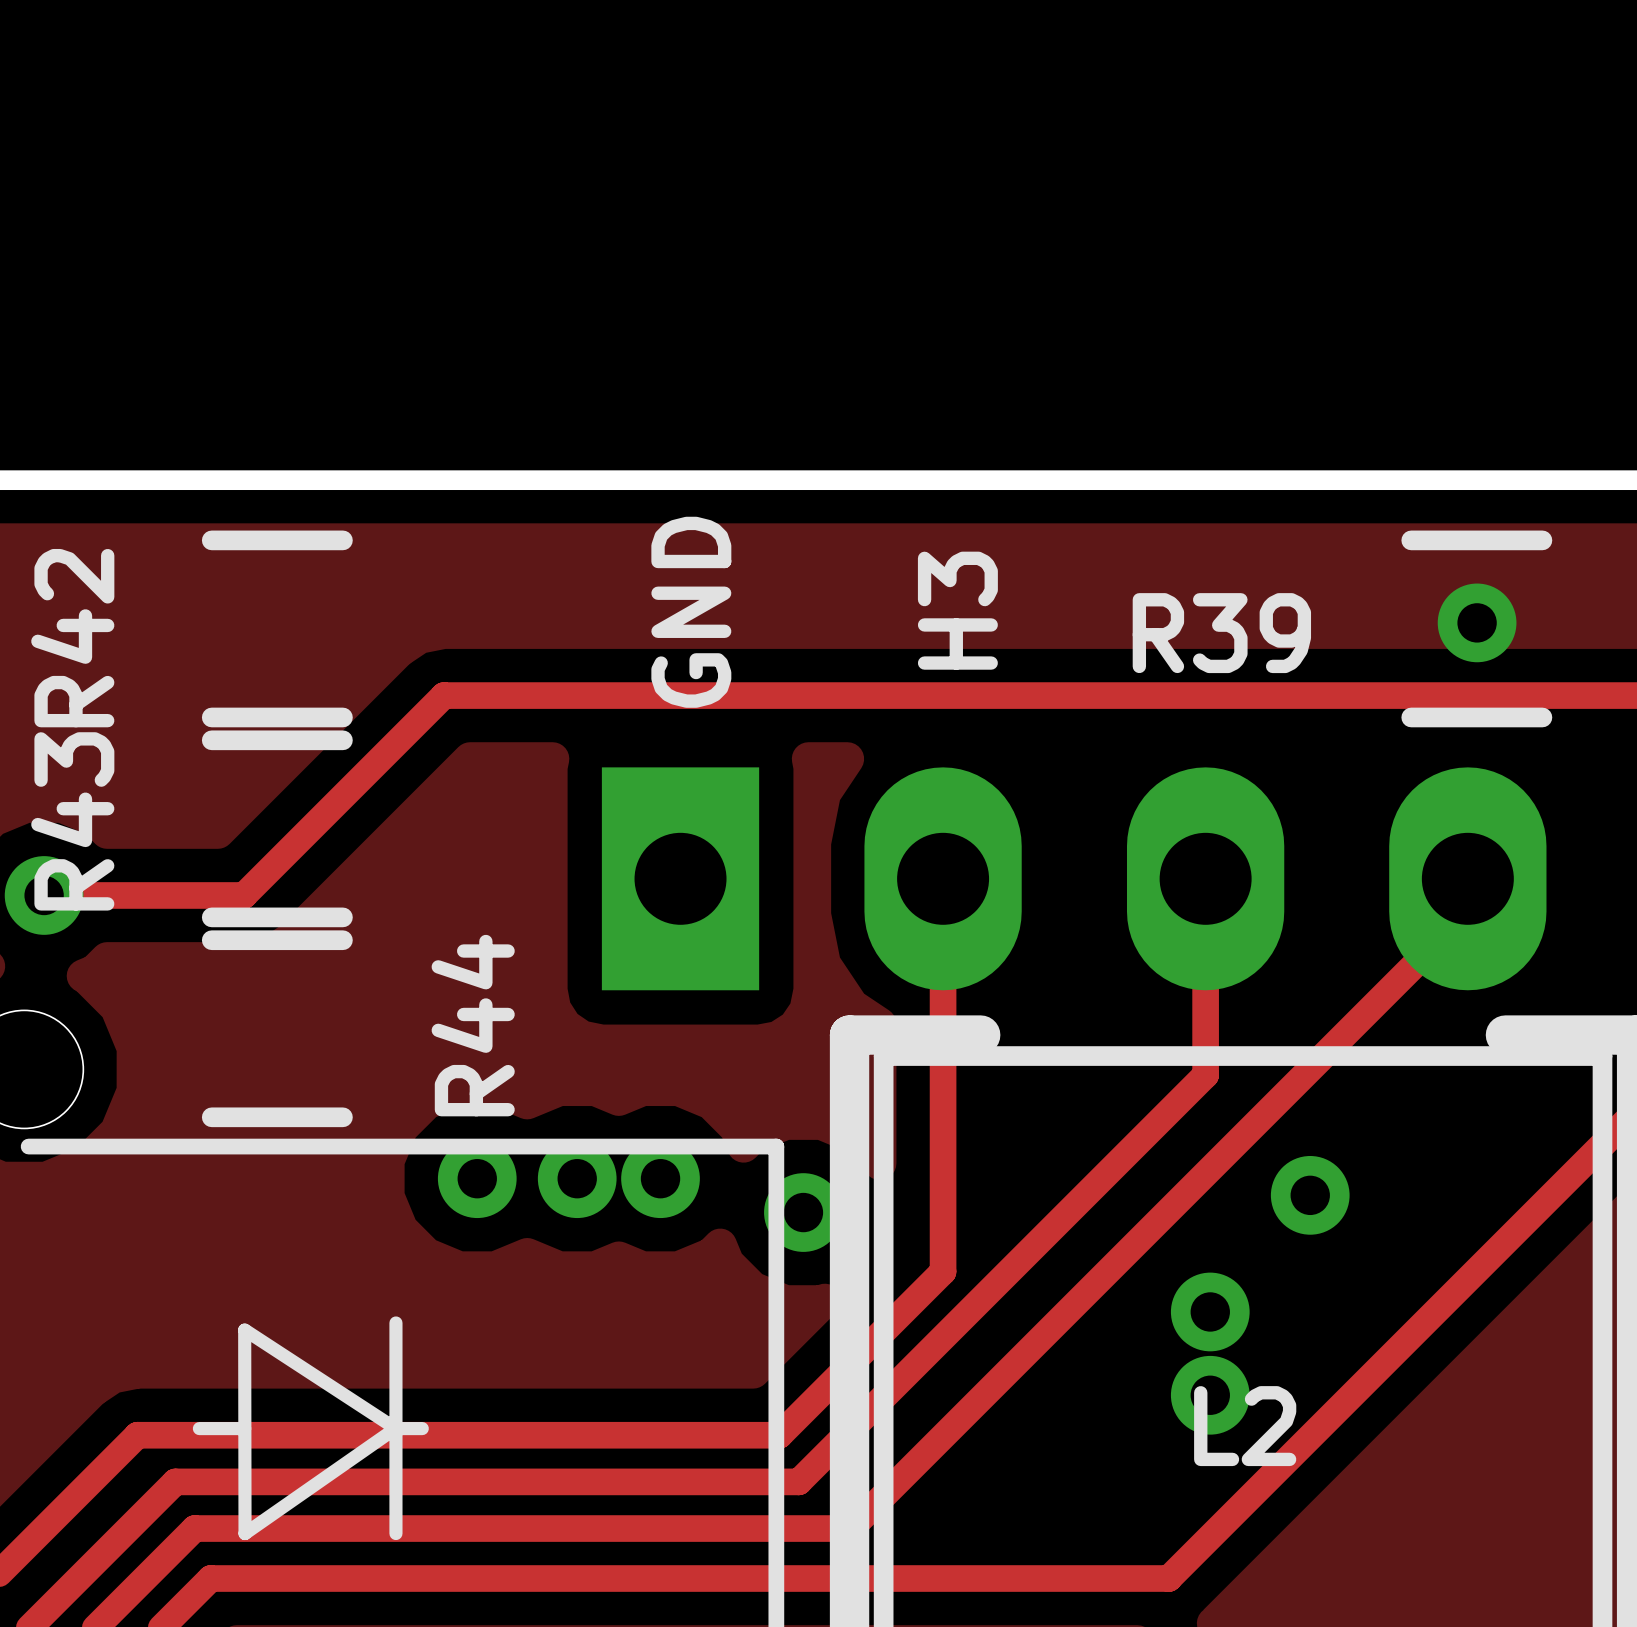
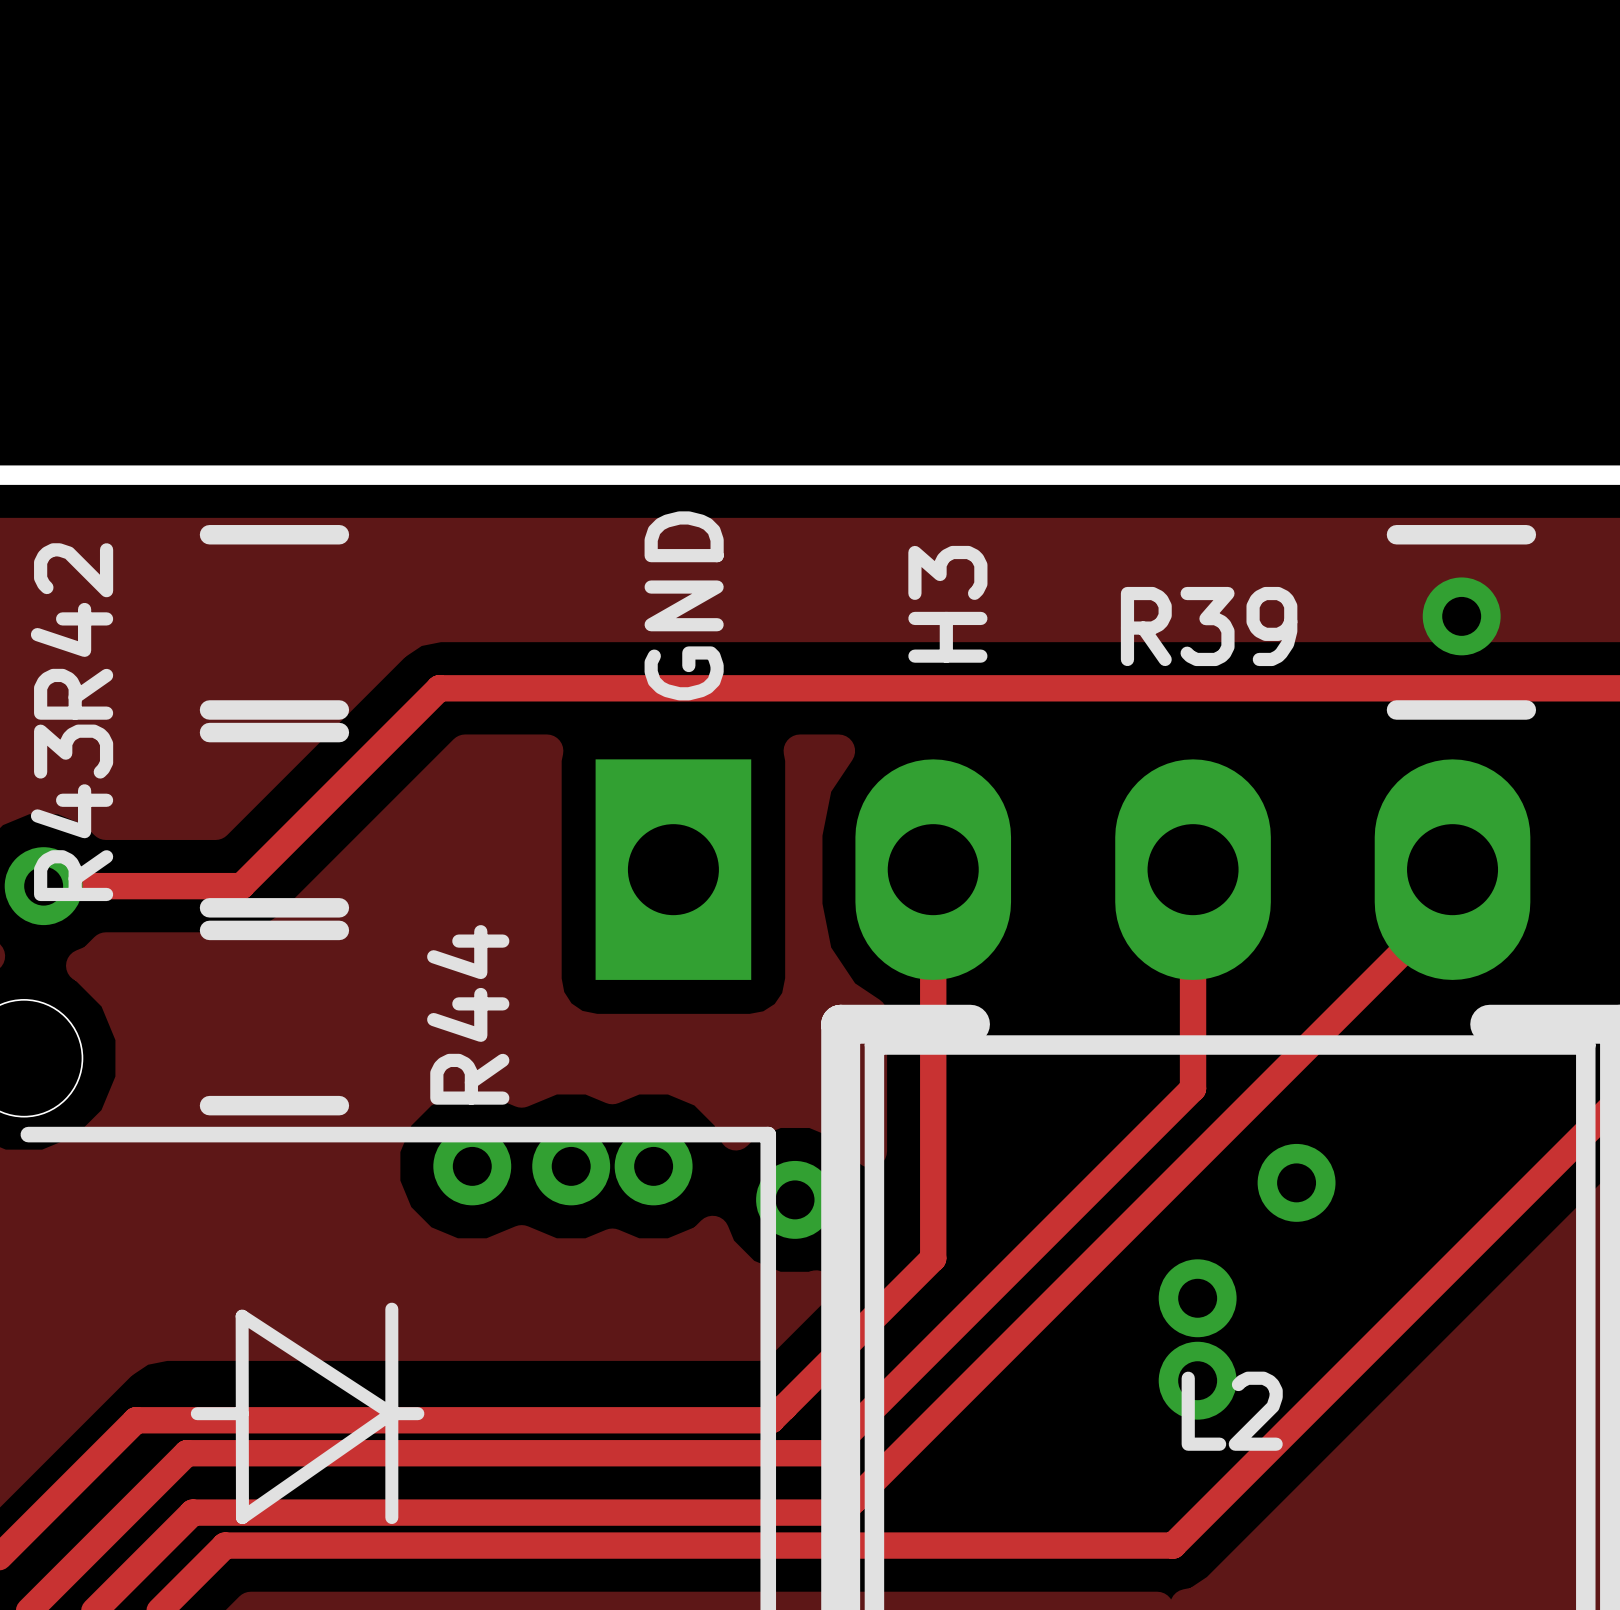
track: (1205, 1075) (798, 1481) (175, 1481) -> (1193, 1063) (1193, 1088) (828, 1453) (186, 1453) (173, 1466)
track: (1185, 1561) (1168, 1578) (210, 1578) -> (1173, 1545) (224, 1545) (208, 1562)

